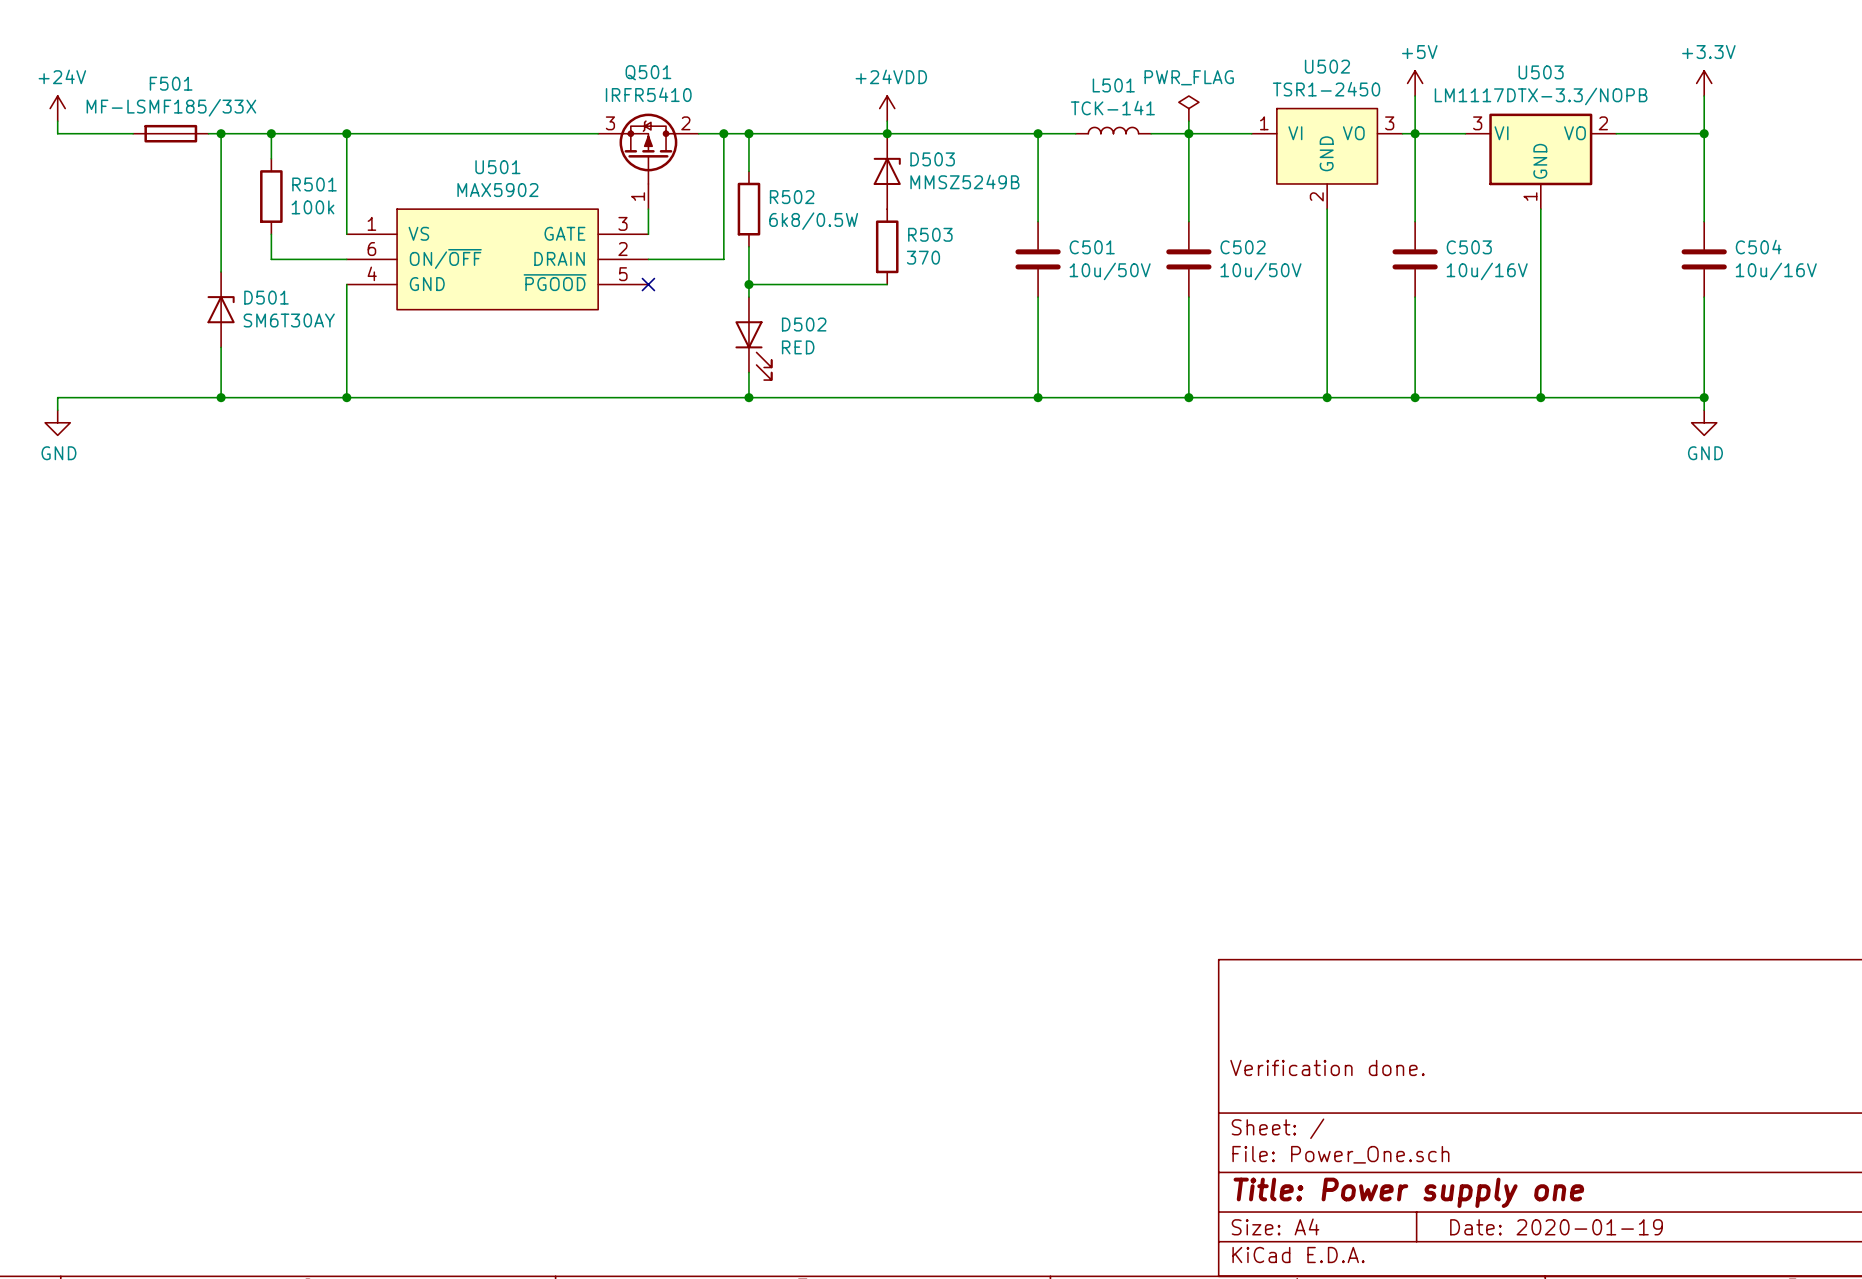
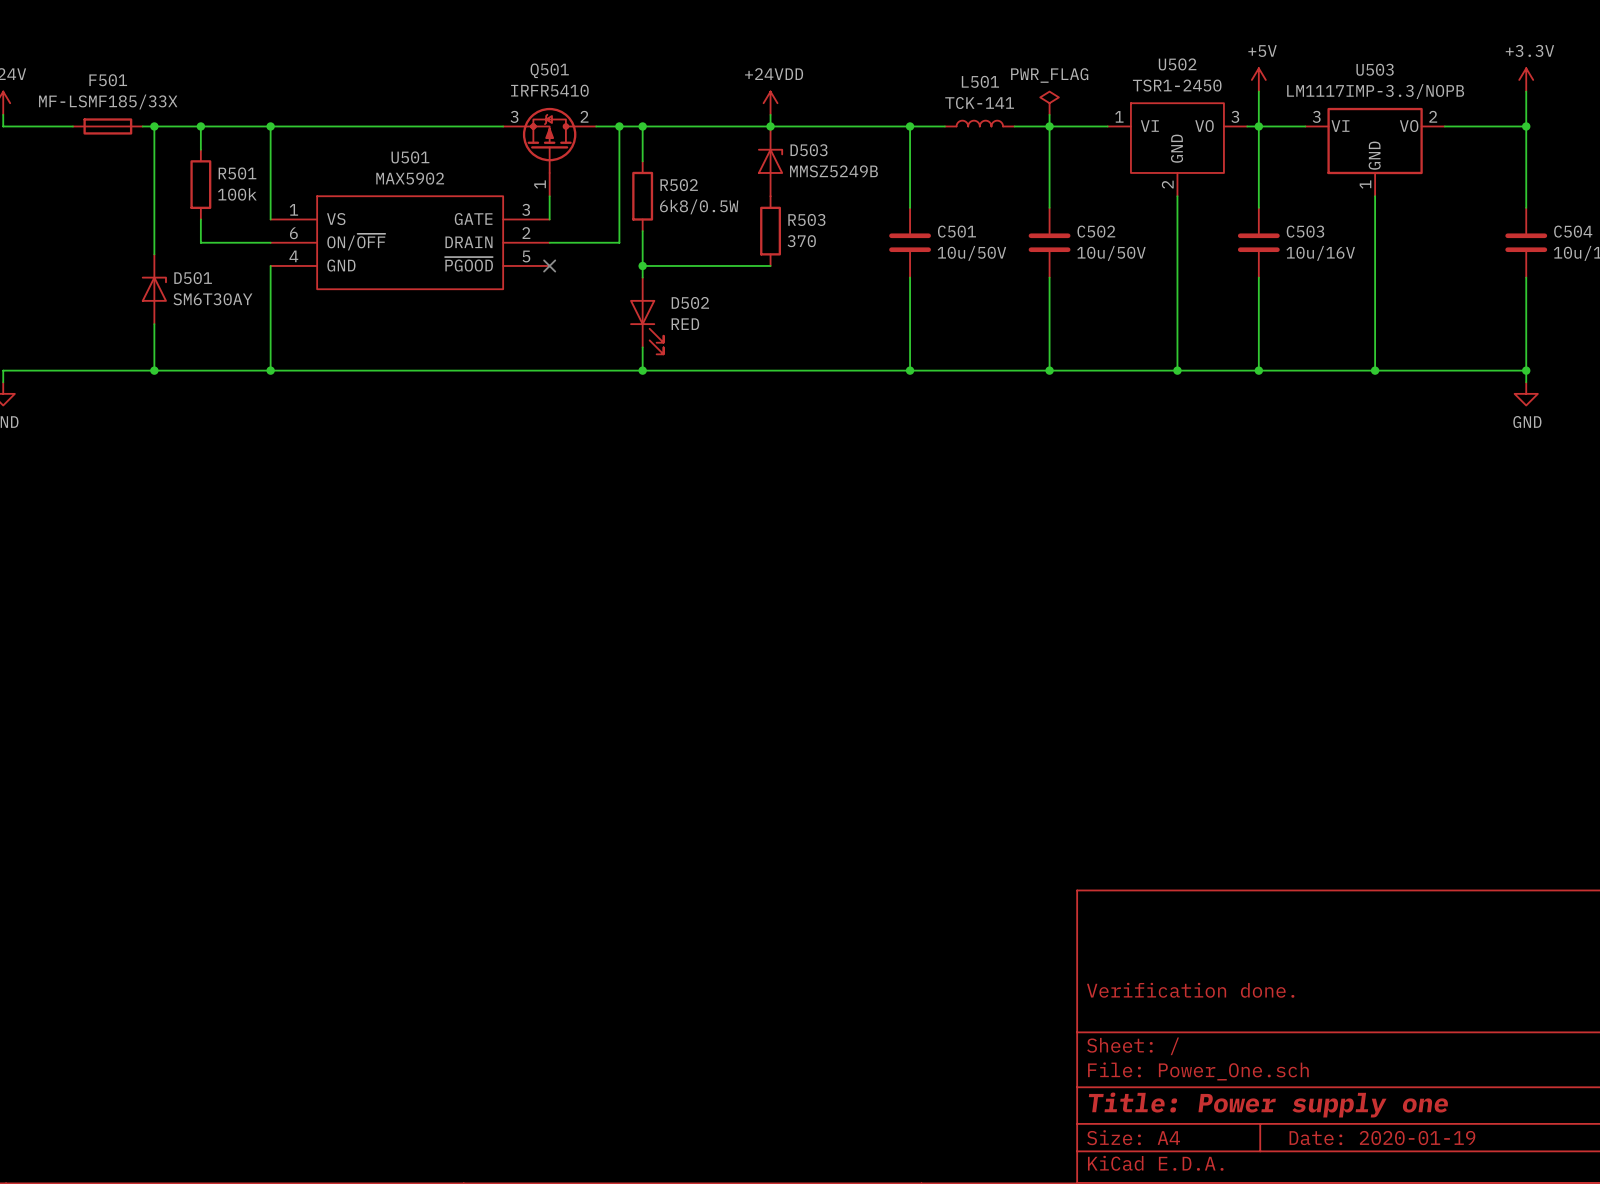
U503 value: LM1117DTX-3.3/NOPB (1541, 96) -> LM1117IMP-3.3/NOPB (1375, 91)

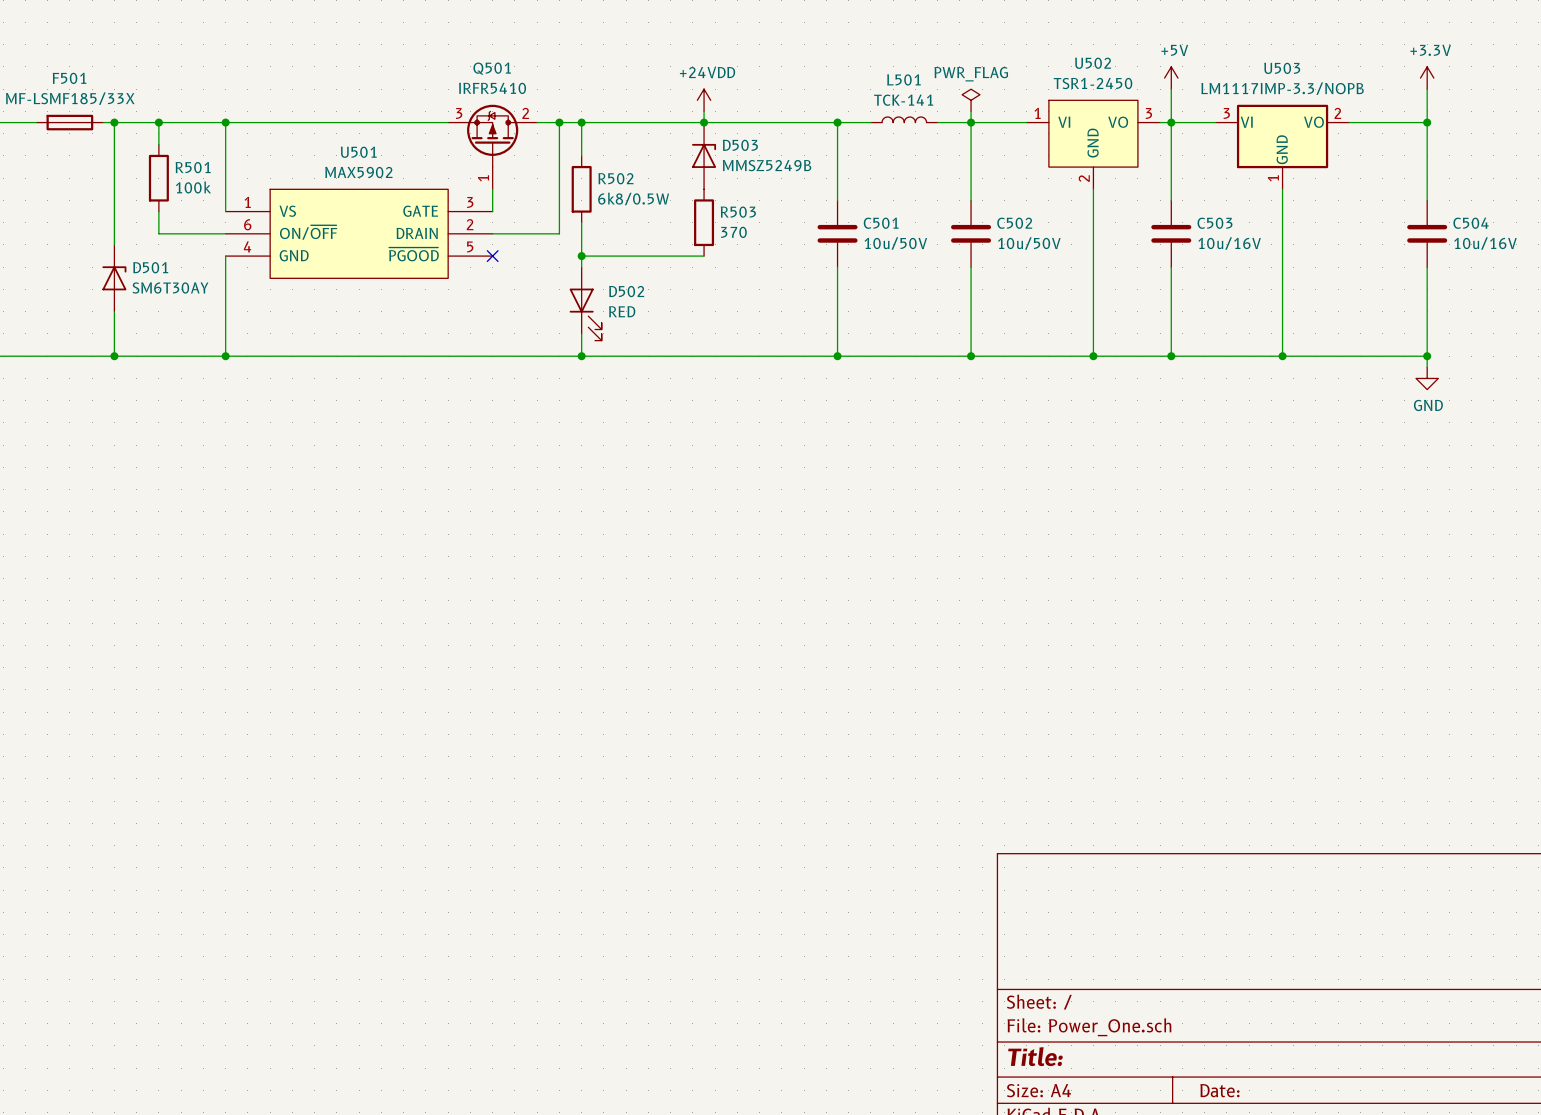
title block: Verification done. (1190, 990) -> none
title block: Title: Power supply one (1268, 1105) -> Title: (1035, 1056)
title block: Date: 2020-01-19 (1382, 1138) -> Date: (1219, 1090)

